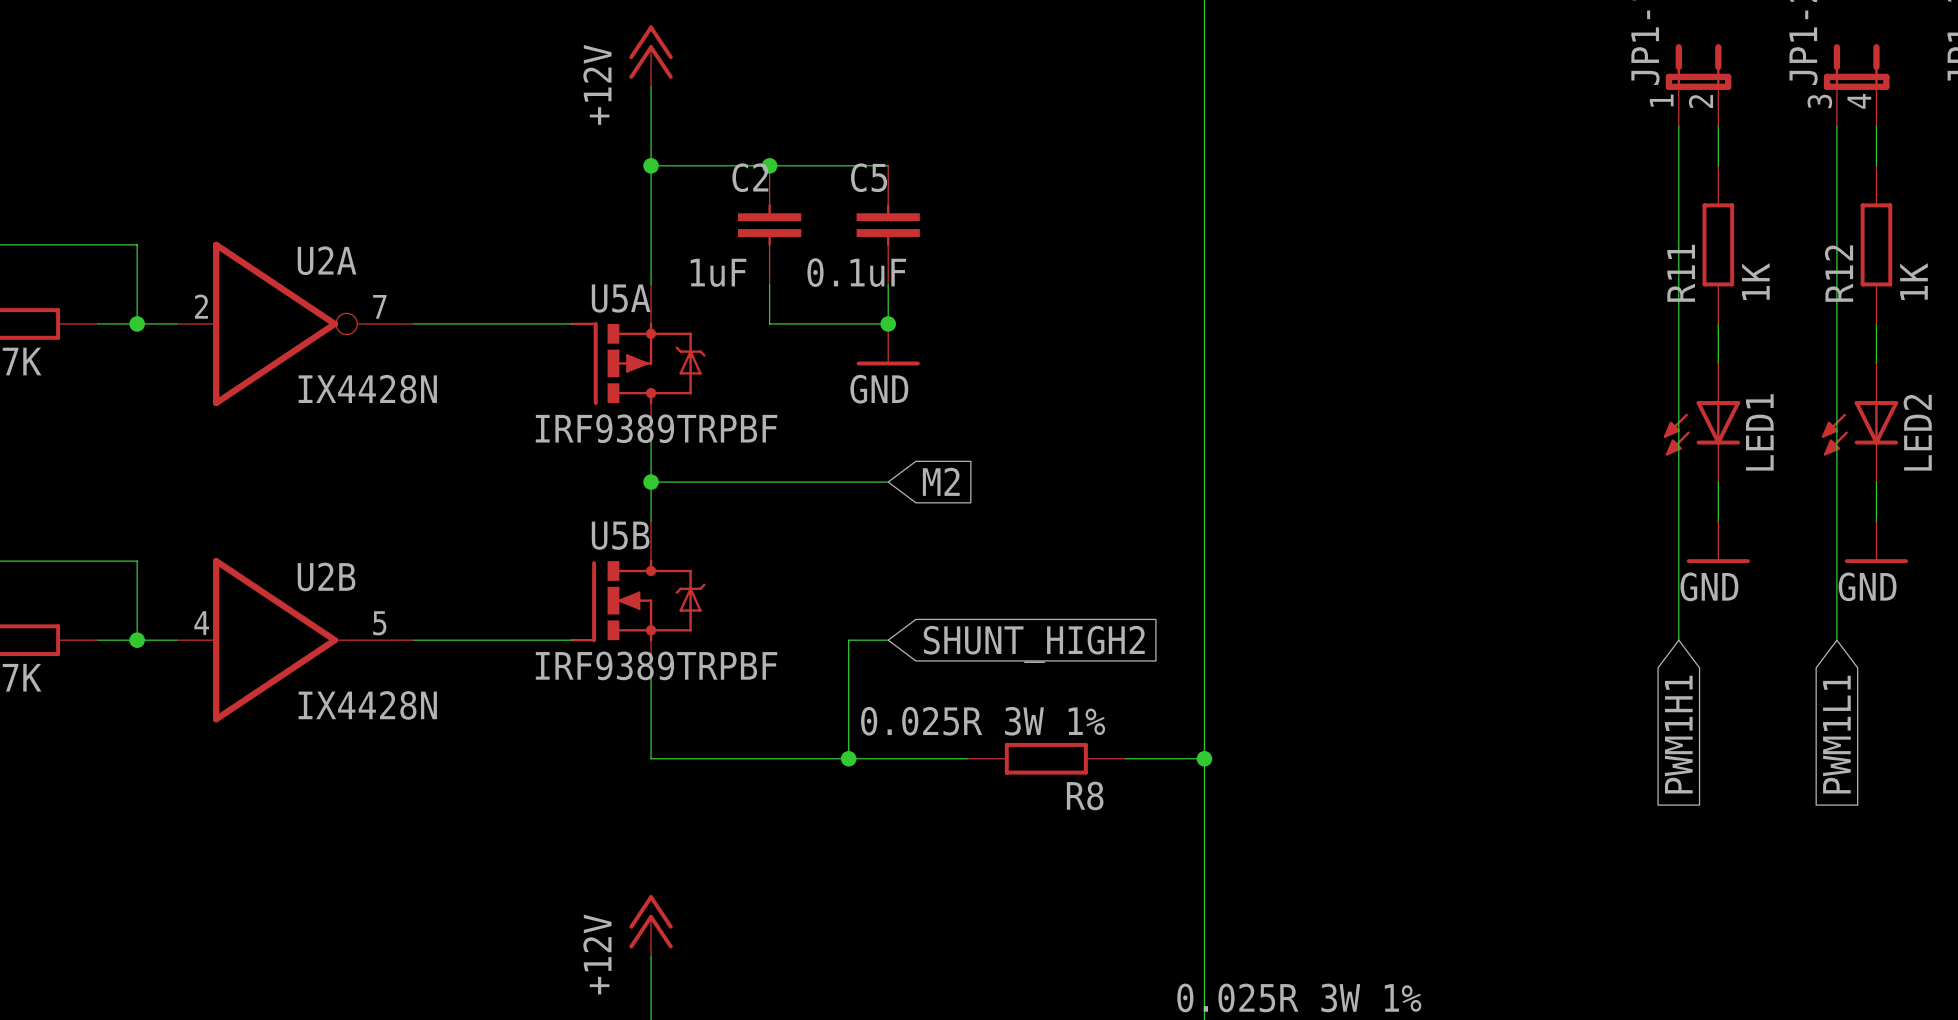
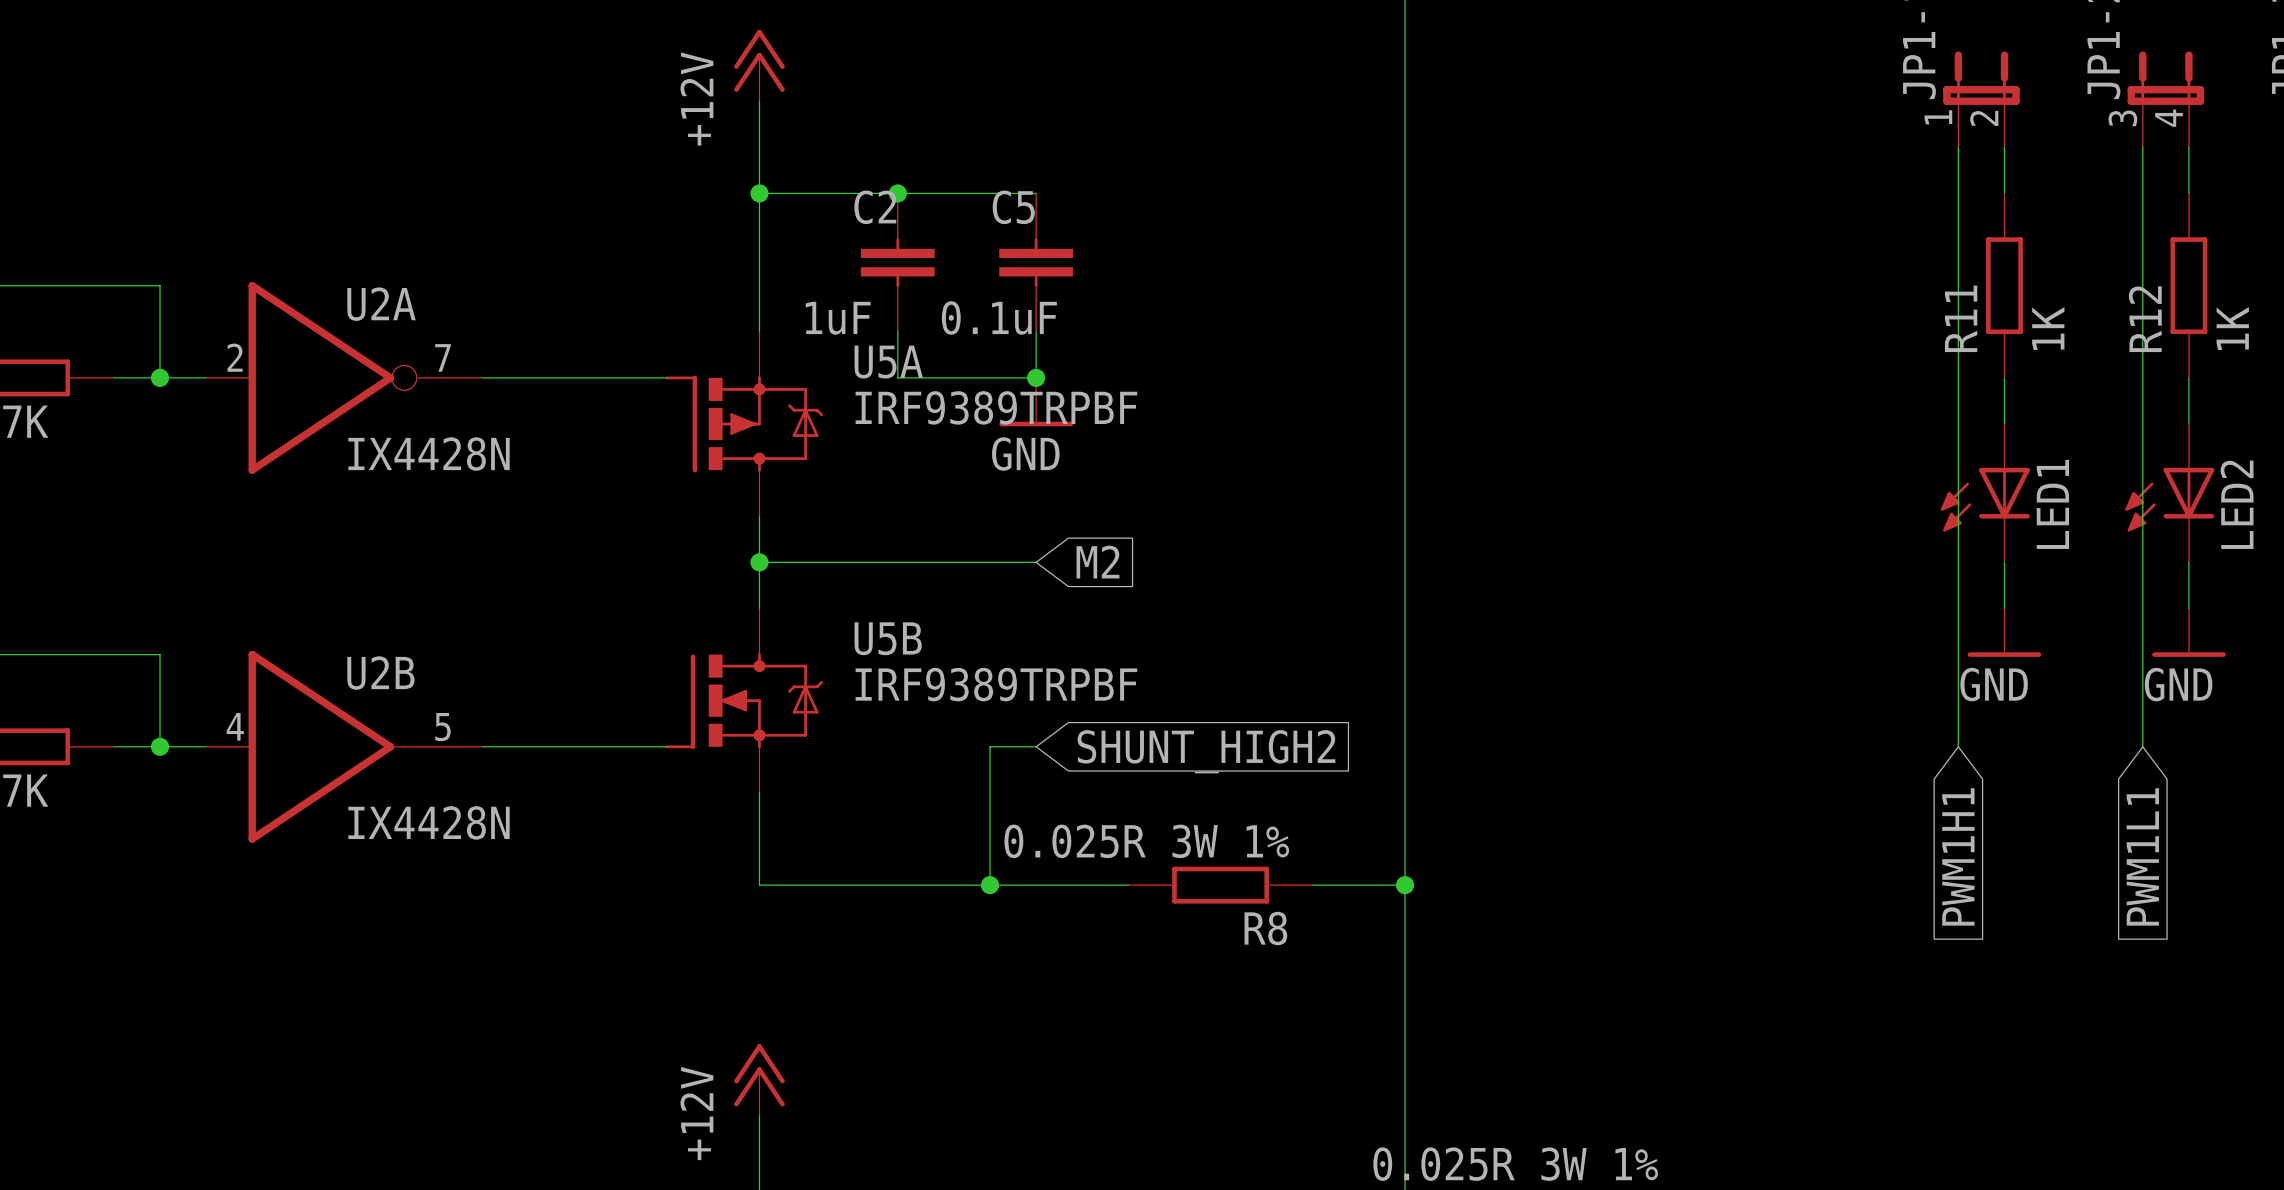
U5A name position: U5A (621, 298) -> U5A (888, 362)
U5A value position: IRF9389TRPBF (656, 428) -> IRF9389TRPBF (996, 407)
U5B name position: U5B (620, 535) -> U5B (888, 638)
U5B value position: IRF9389TRPBF (656, 665) -> IRF9389TRPBF (996, 684)

